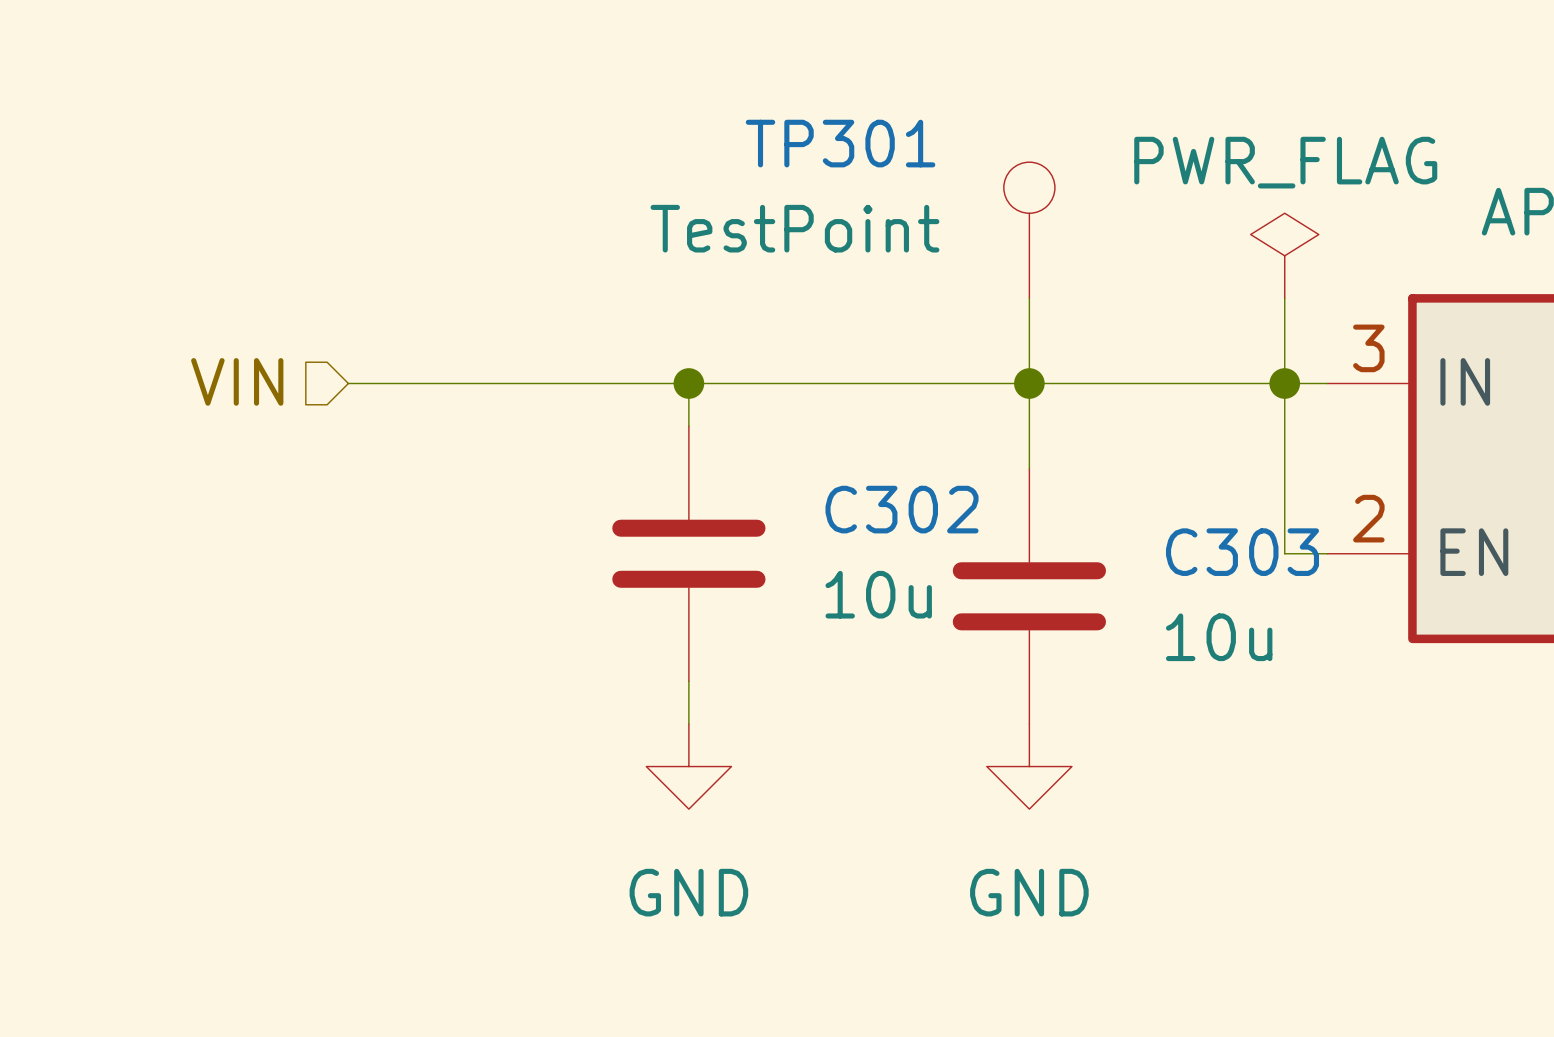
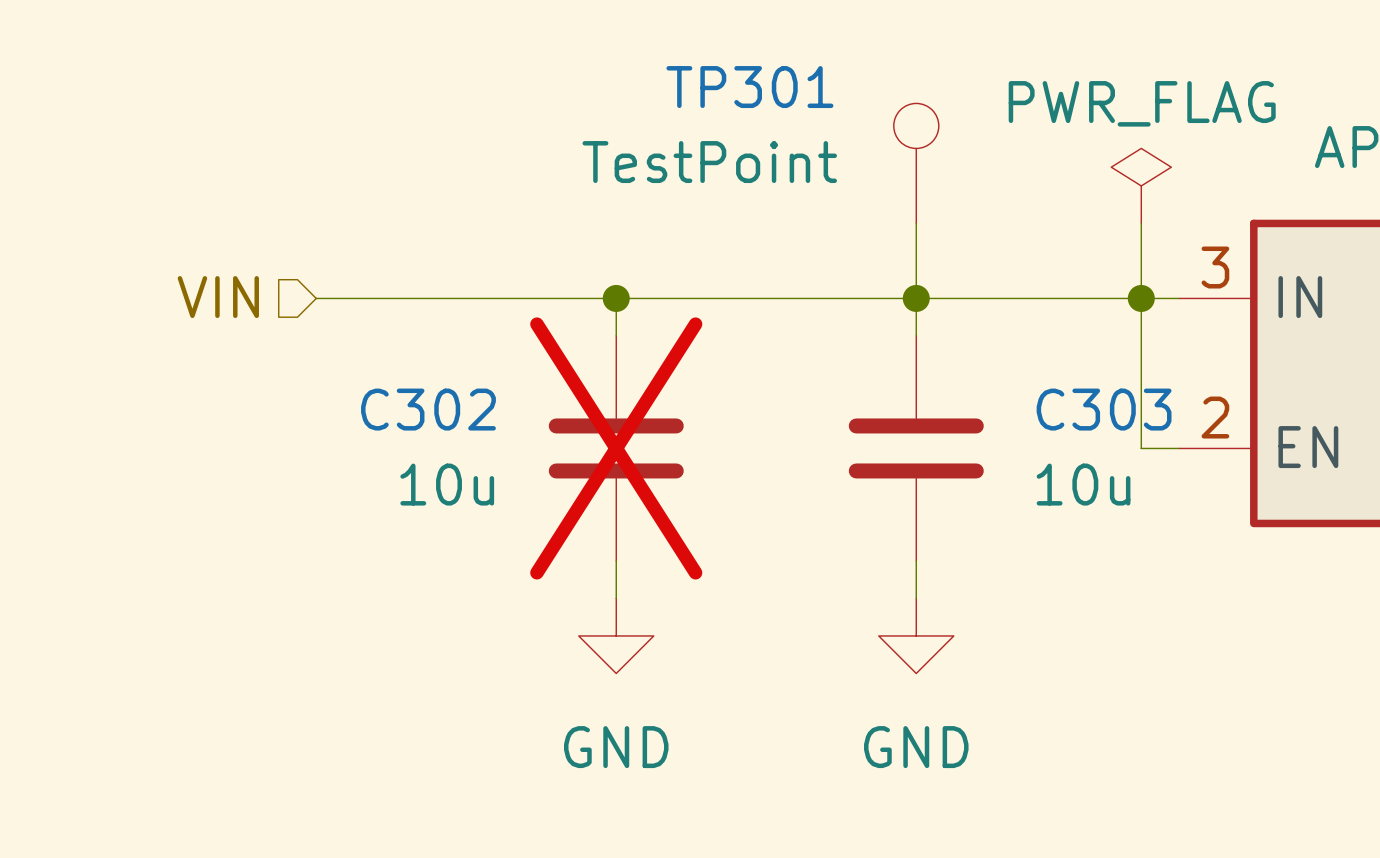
C302 name position: C302 (902, 509) -> C302 (428, 409)
C302 do-not-place cross: none -> (616, 448)
C302 value position: 10u (878, 594) -> 10u (447, 484)
C303 position: (1029, 596) -> (916, 448)

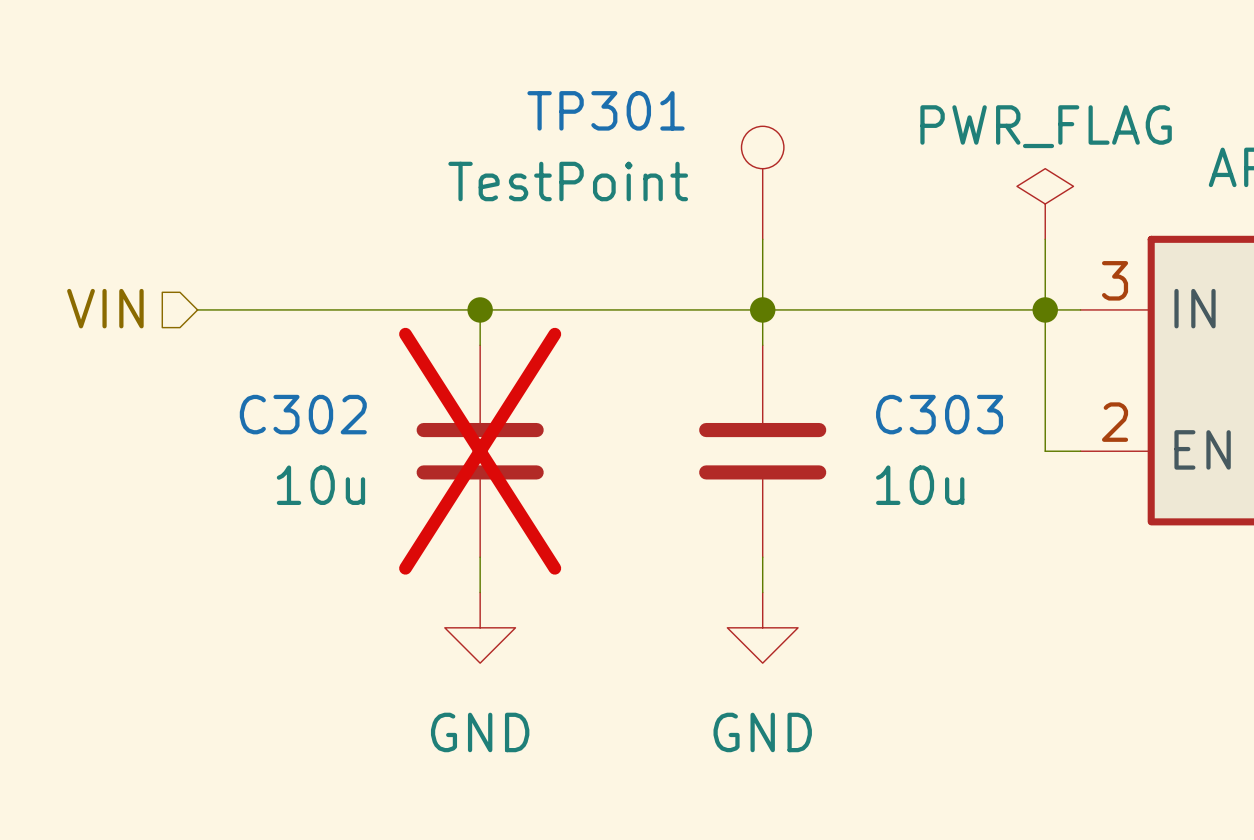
TP301 position: (916, 163) -> (762, 182)
wire: (916, 223) (916, 335) -> (762, 239) (762, 345)
hierarchical label position: VIN (218, 297) -> VIN (105, 308)
wire: none -> (197, 309) (268, 309)
wire: (616, 298) (616, 335) -> (480, 309) (480, 345)
junction position: (616, 298) -> (480, 309)
junction position: (916, 298) -> (762, 309)
C302 position: (616, 448) -> (480, 451)
C303 position: (916, 448) -> (762, 451)
wire: (616, 560) (616, 598) -> (480, 557) (480, 592)
wire: (916, 560) (916, 598) -> (762, 557) (762, 592)
power symbol position: GND (616, 635) -> GND (480, 627)
power symbol position: GND (916, 635) -> GND (762, 627)

